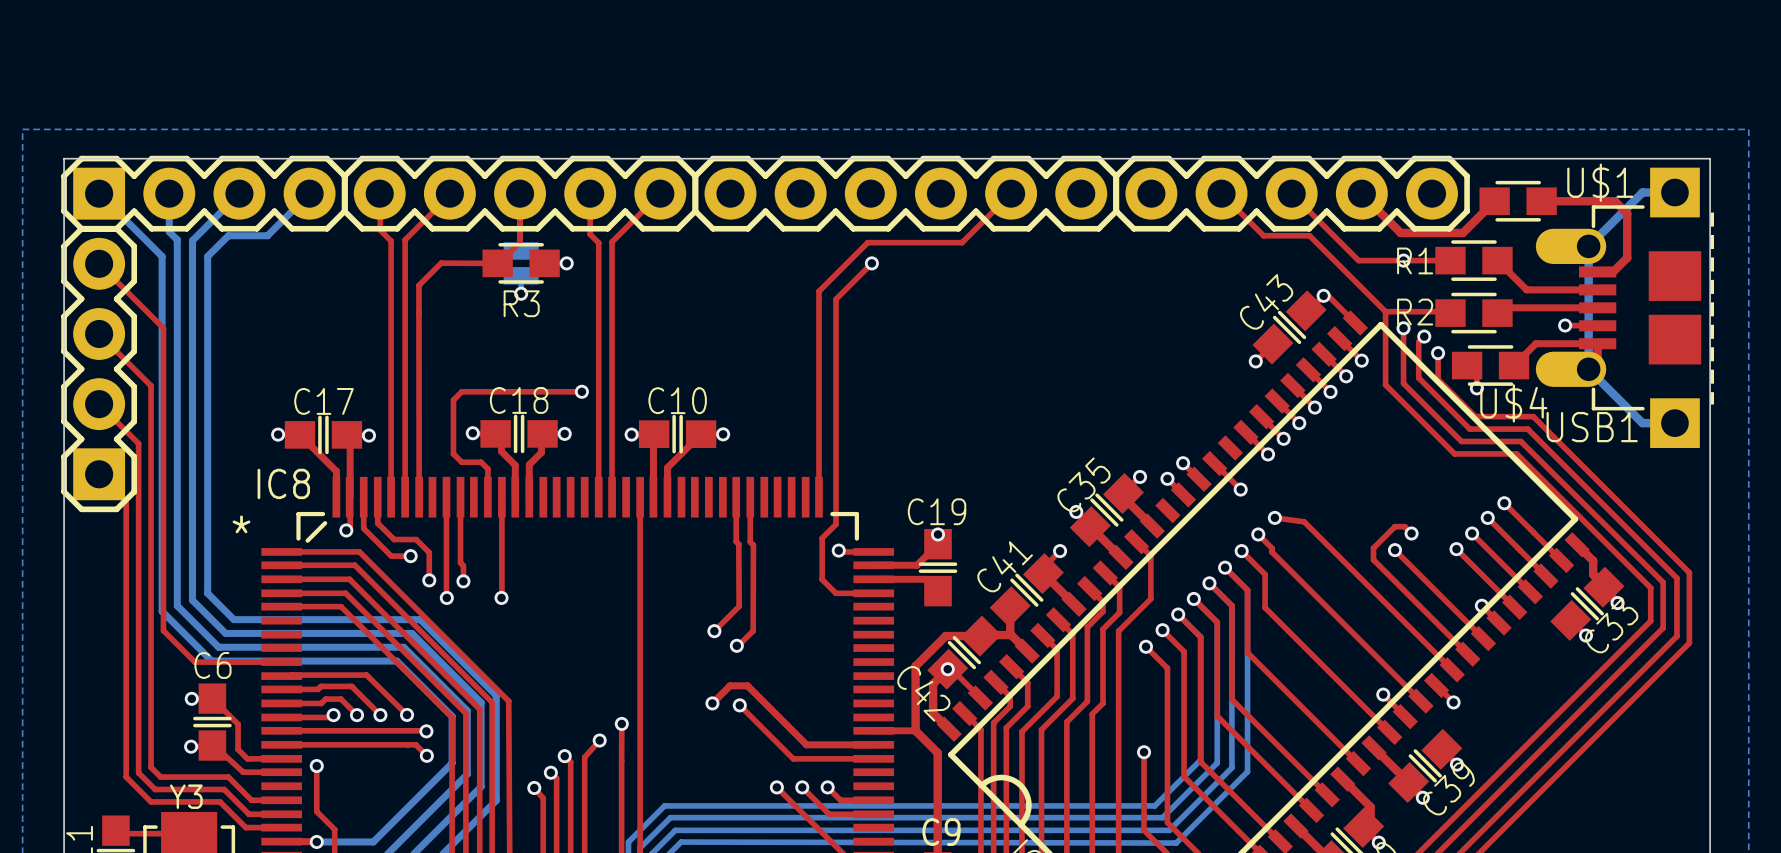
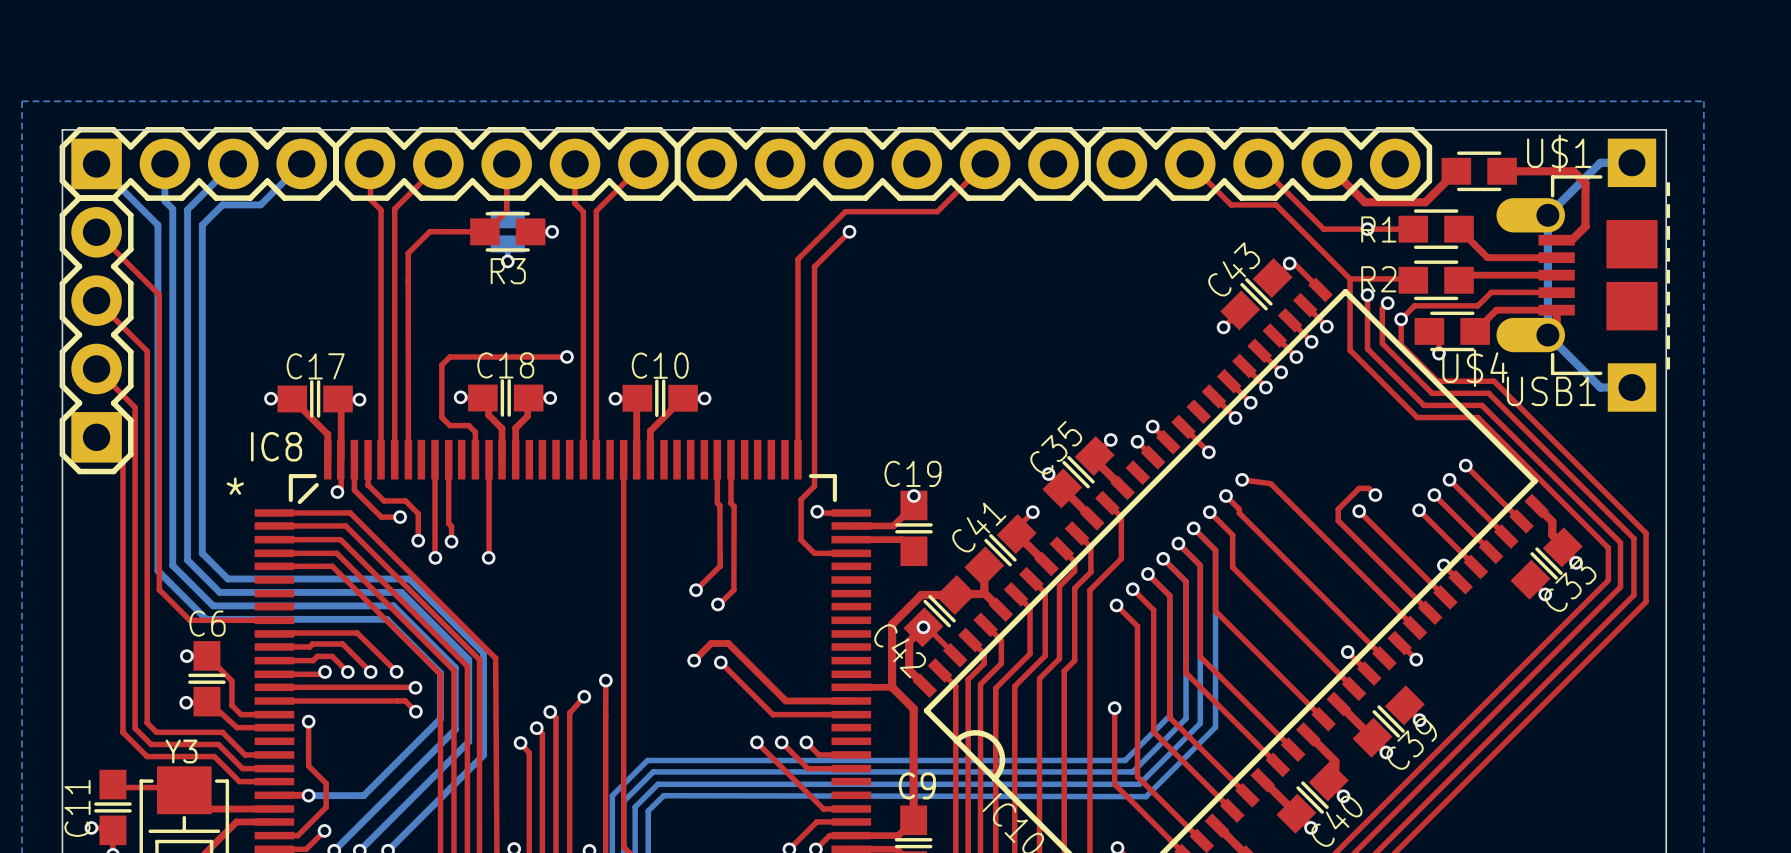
top track: none -> (1524, 292) (1491, 292) (1477, 305) (1414, 305) (1401, 319)
via: (1565, 325) -> none

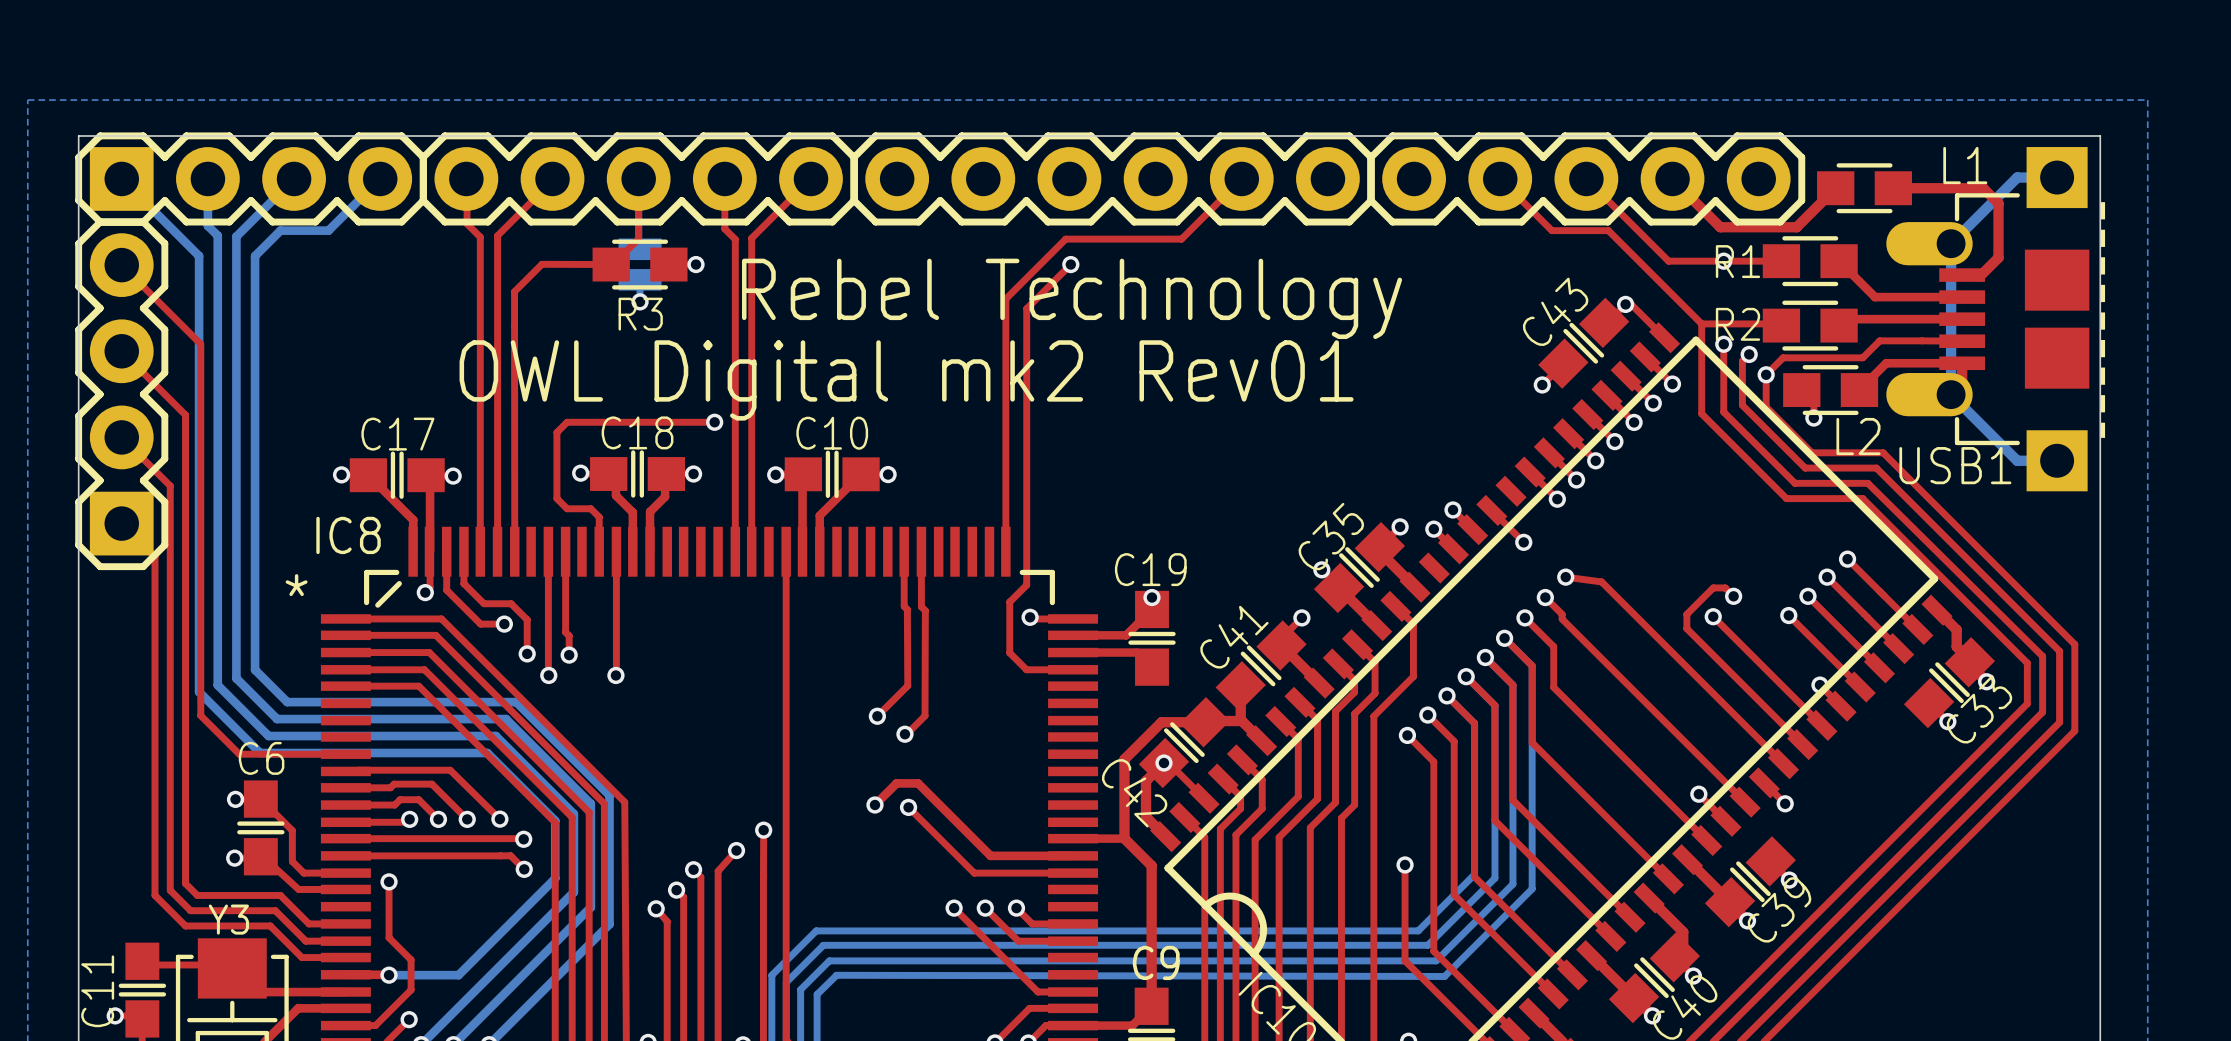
U$1 name: U$1 (1559, 153) -> L1 (1965, 165)
text: none -> Rebel Technology (1072, 298)
text: none -> OWL Digital mk2 Rev01 (906, 380)
U$4 name: U$4 (1475, 368) -> L2 (1858, 436)

